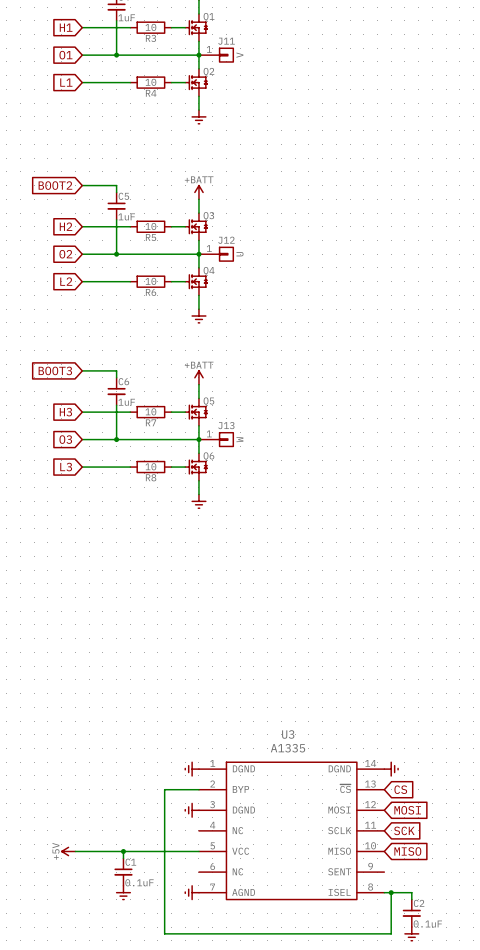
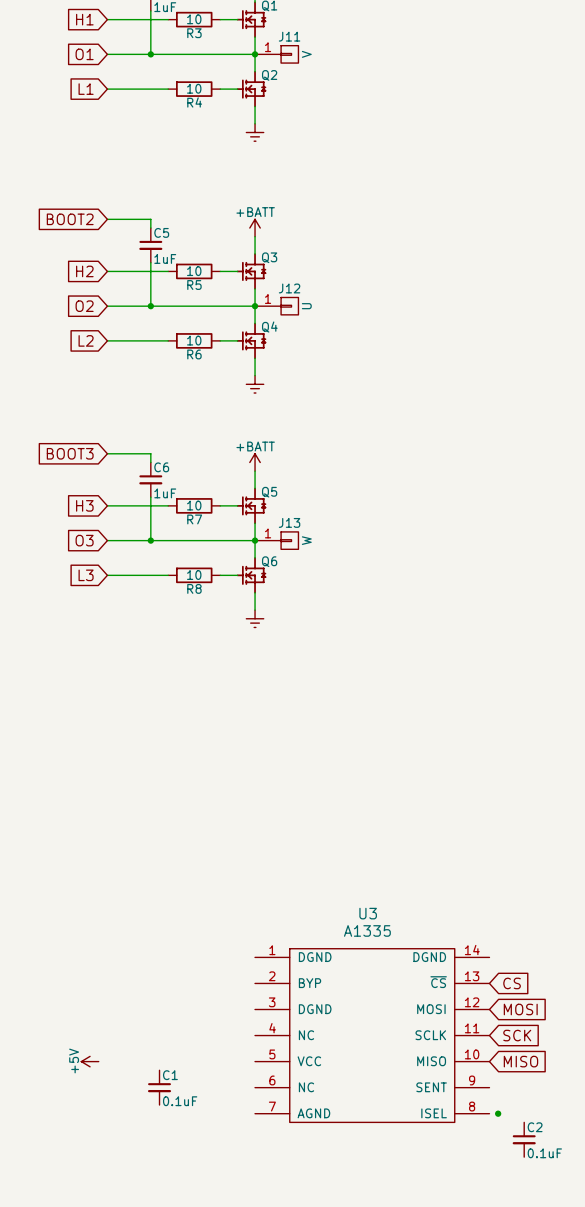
power symbol: (192, 769) -> none
power symbol: (391, 769) -> none
wire: (198, 789) (164, 789) (164, 933) (391, 933) (391, 892) -> none
power symbol: (192, 810) -> none
wire: (75, 851) (198, 851) -> none
wire: (123, 851) (123, 858) -> none
junction: (123, 851) -> none
power symbol: (123, 892) -> none
power symbol: (192, 892) -> none
wire: (384, 892) (411, 892) (411, 899) -> none
power symbol: (411, 933) -> none

